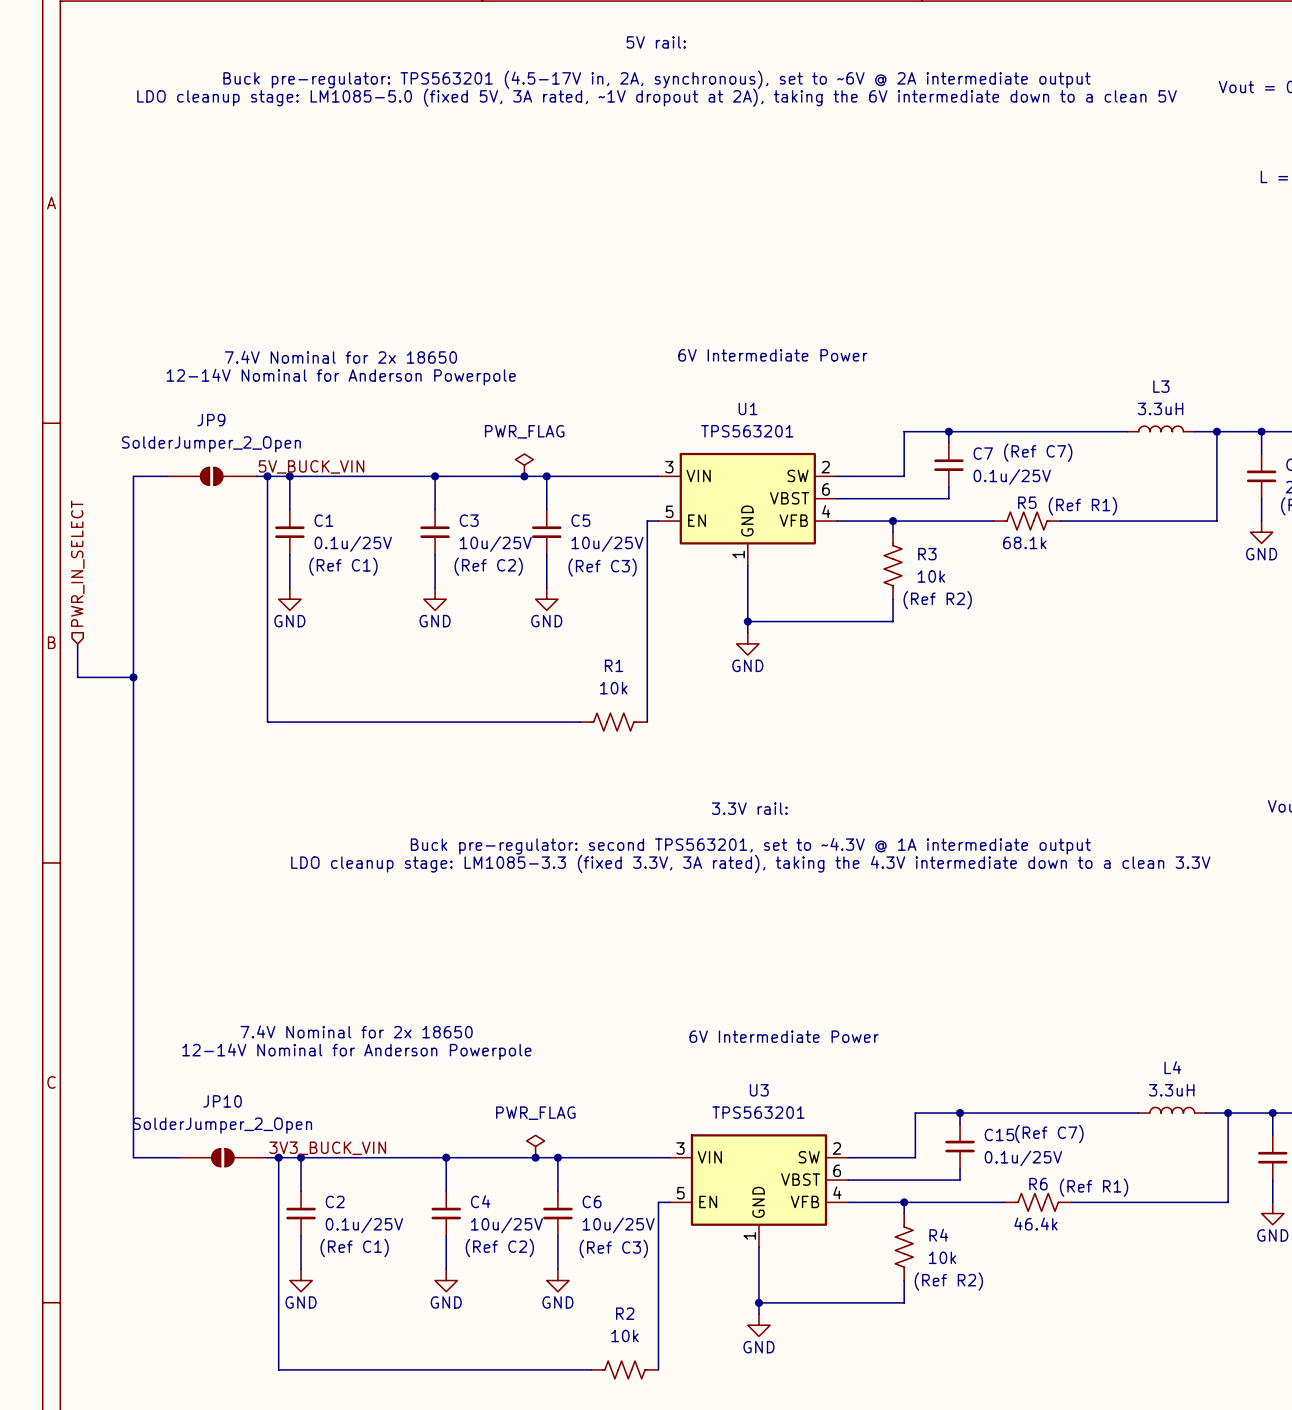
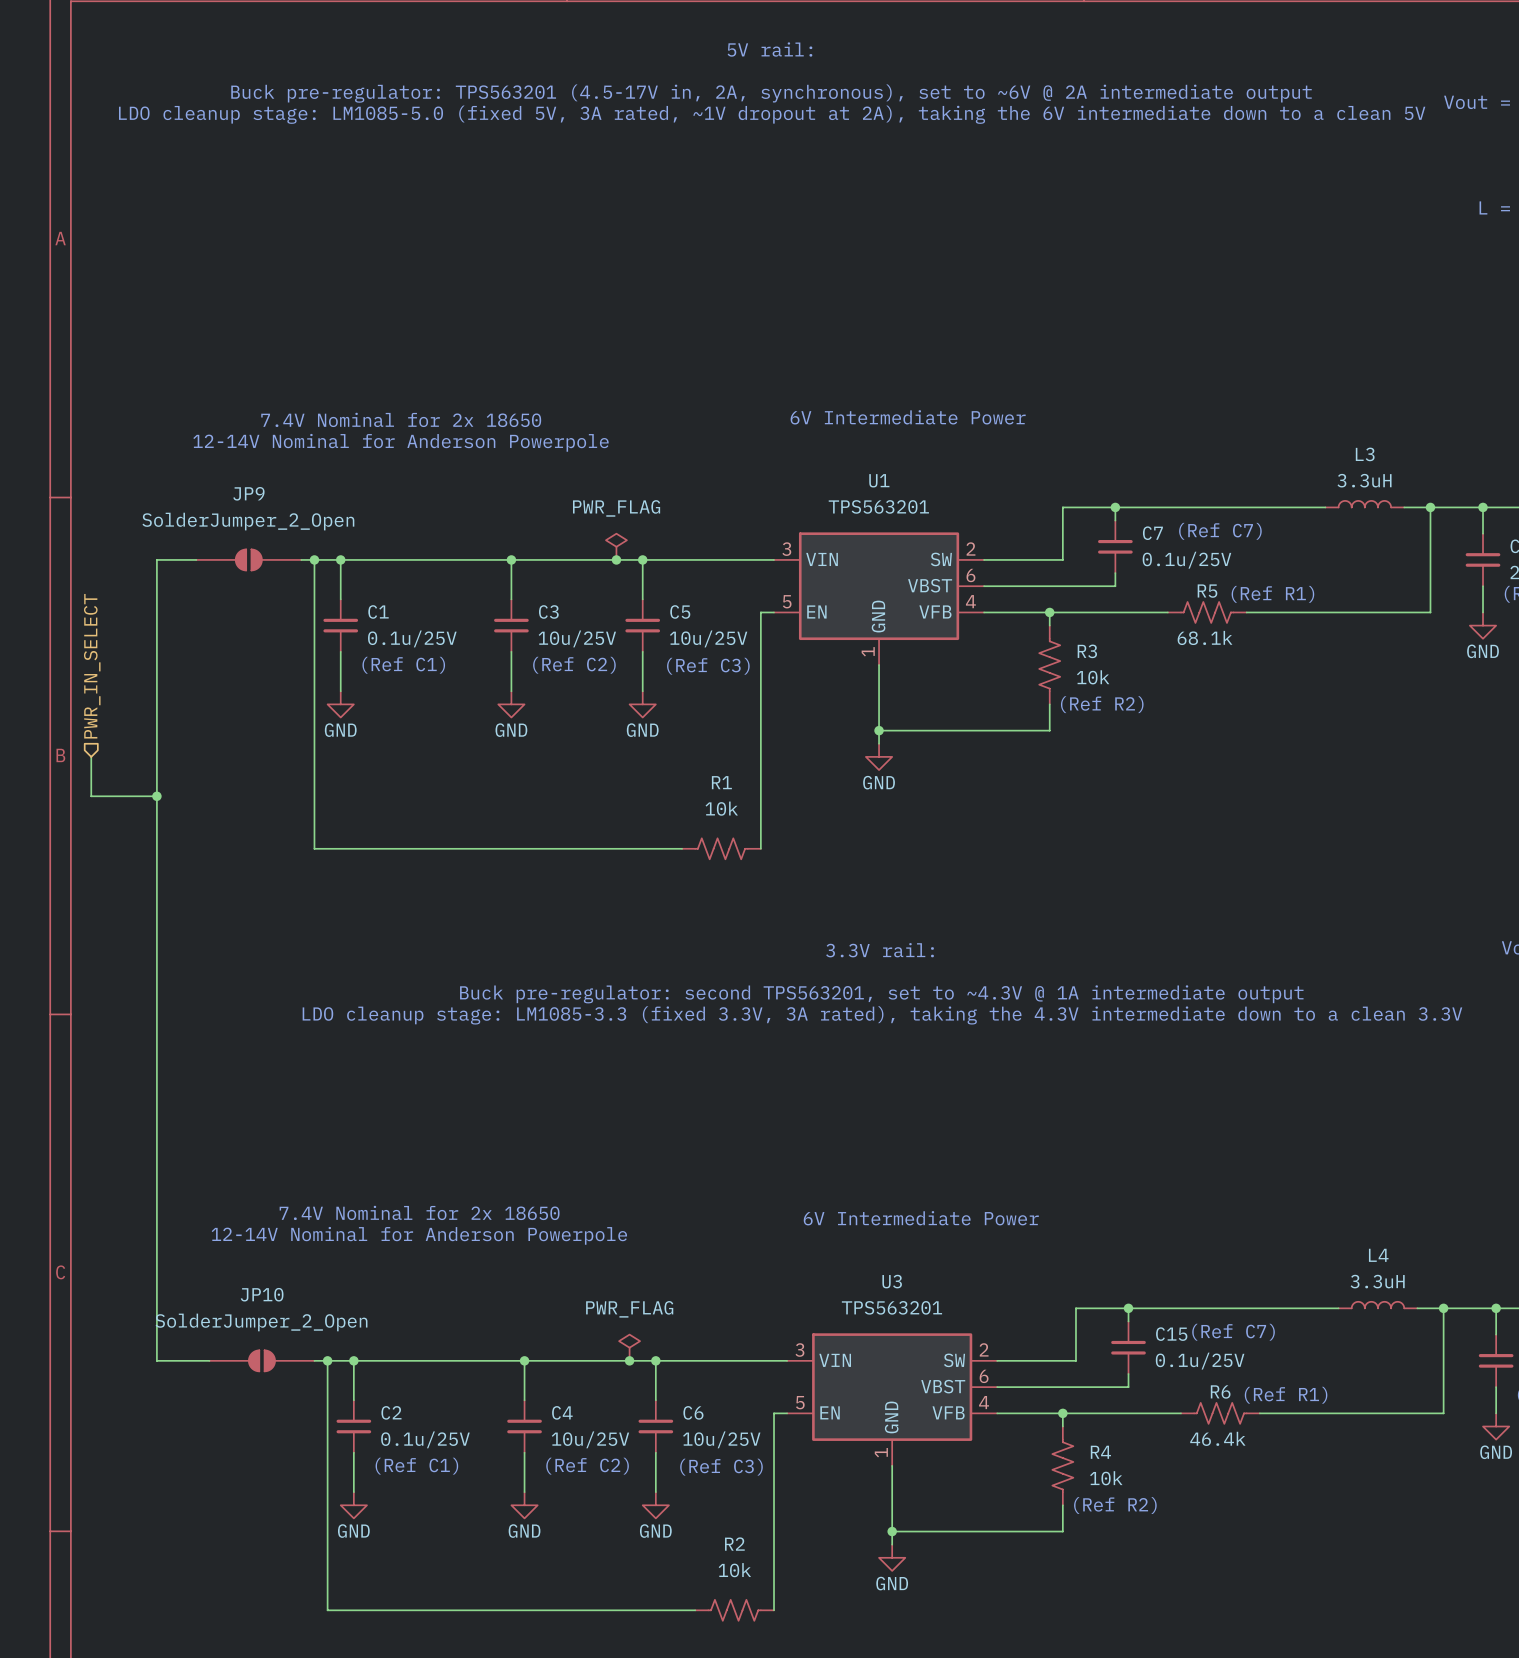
label: 5V_BUCK_VIN (311, 466) -> none
label: 3V3_BUCK_VIN (327, 1148) -> none

